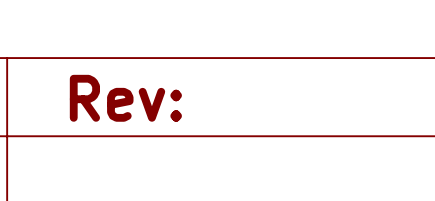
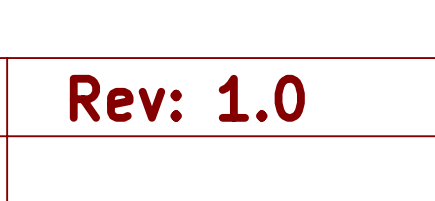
title block: Rev: (125, 98) -> Rev: 1.0 (187, 98)

